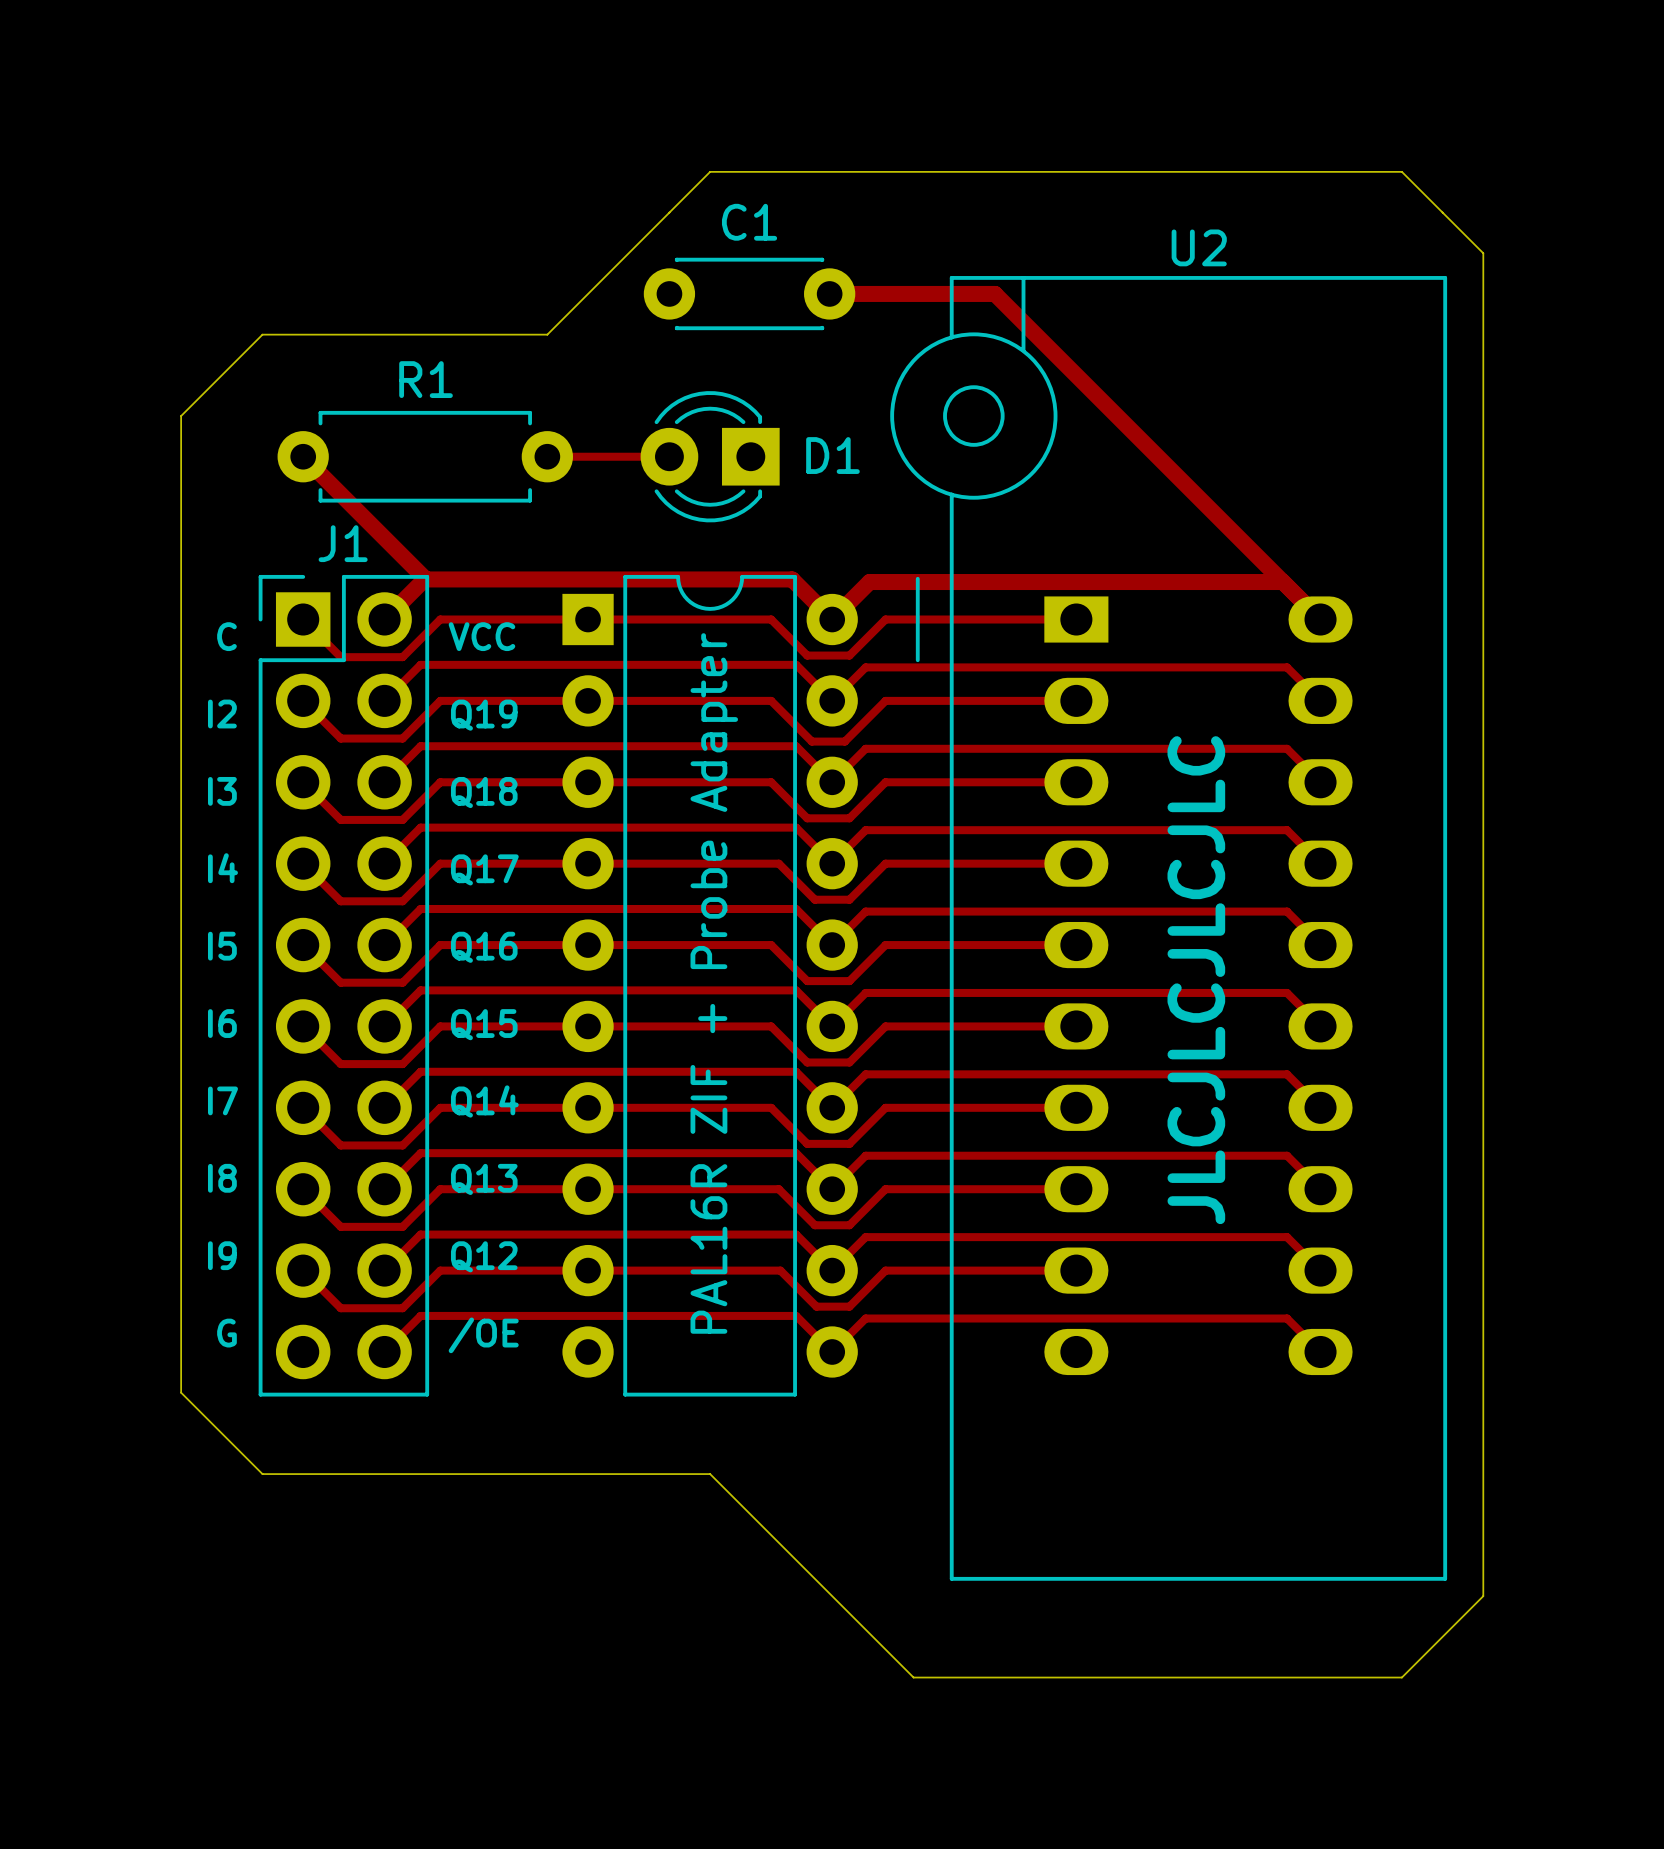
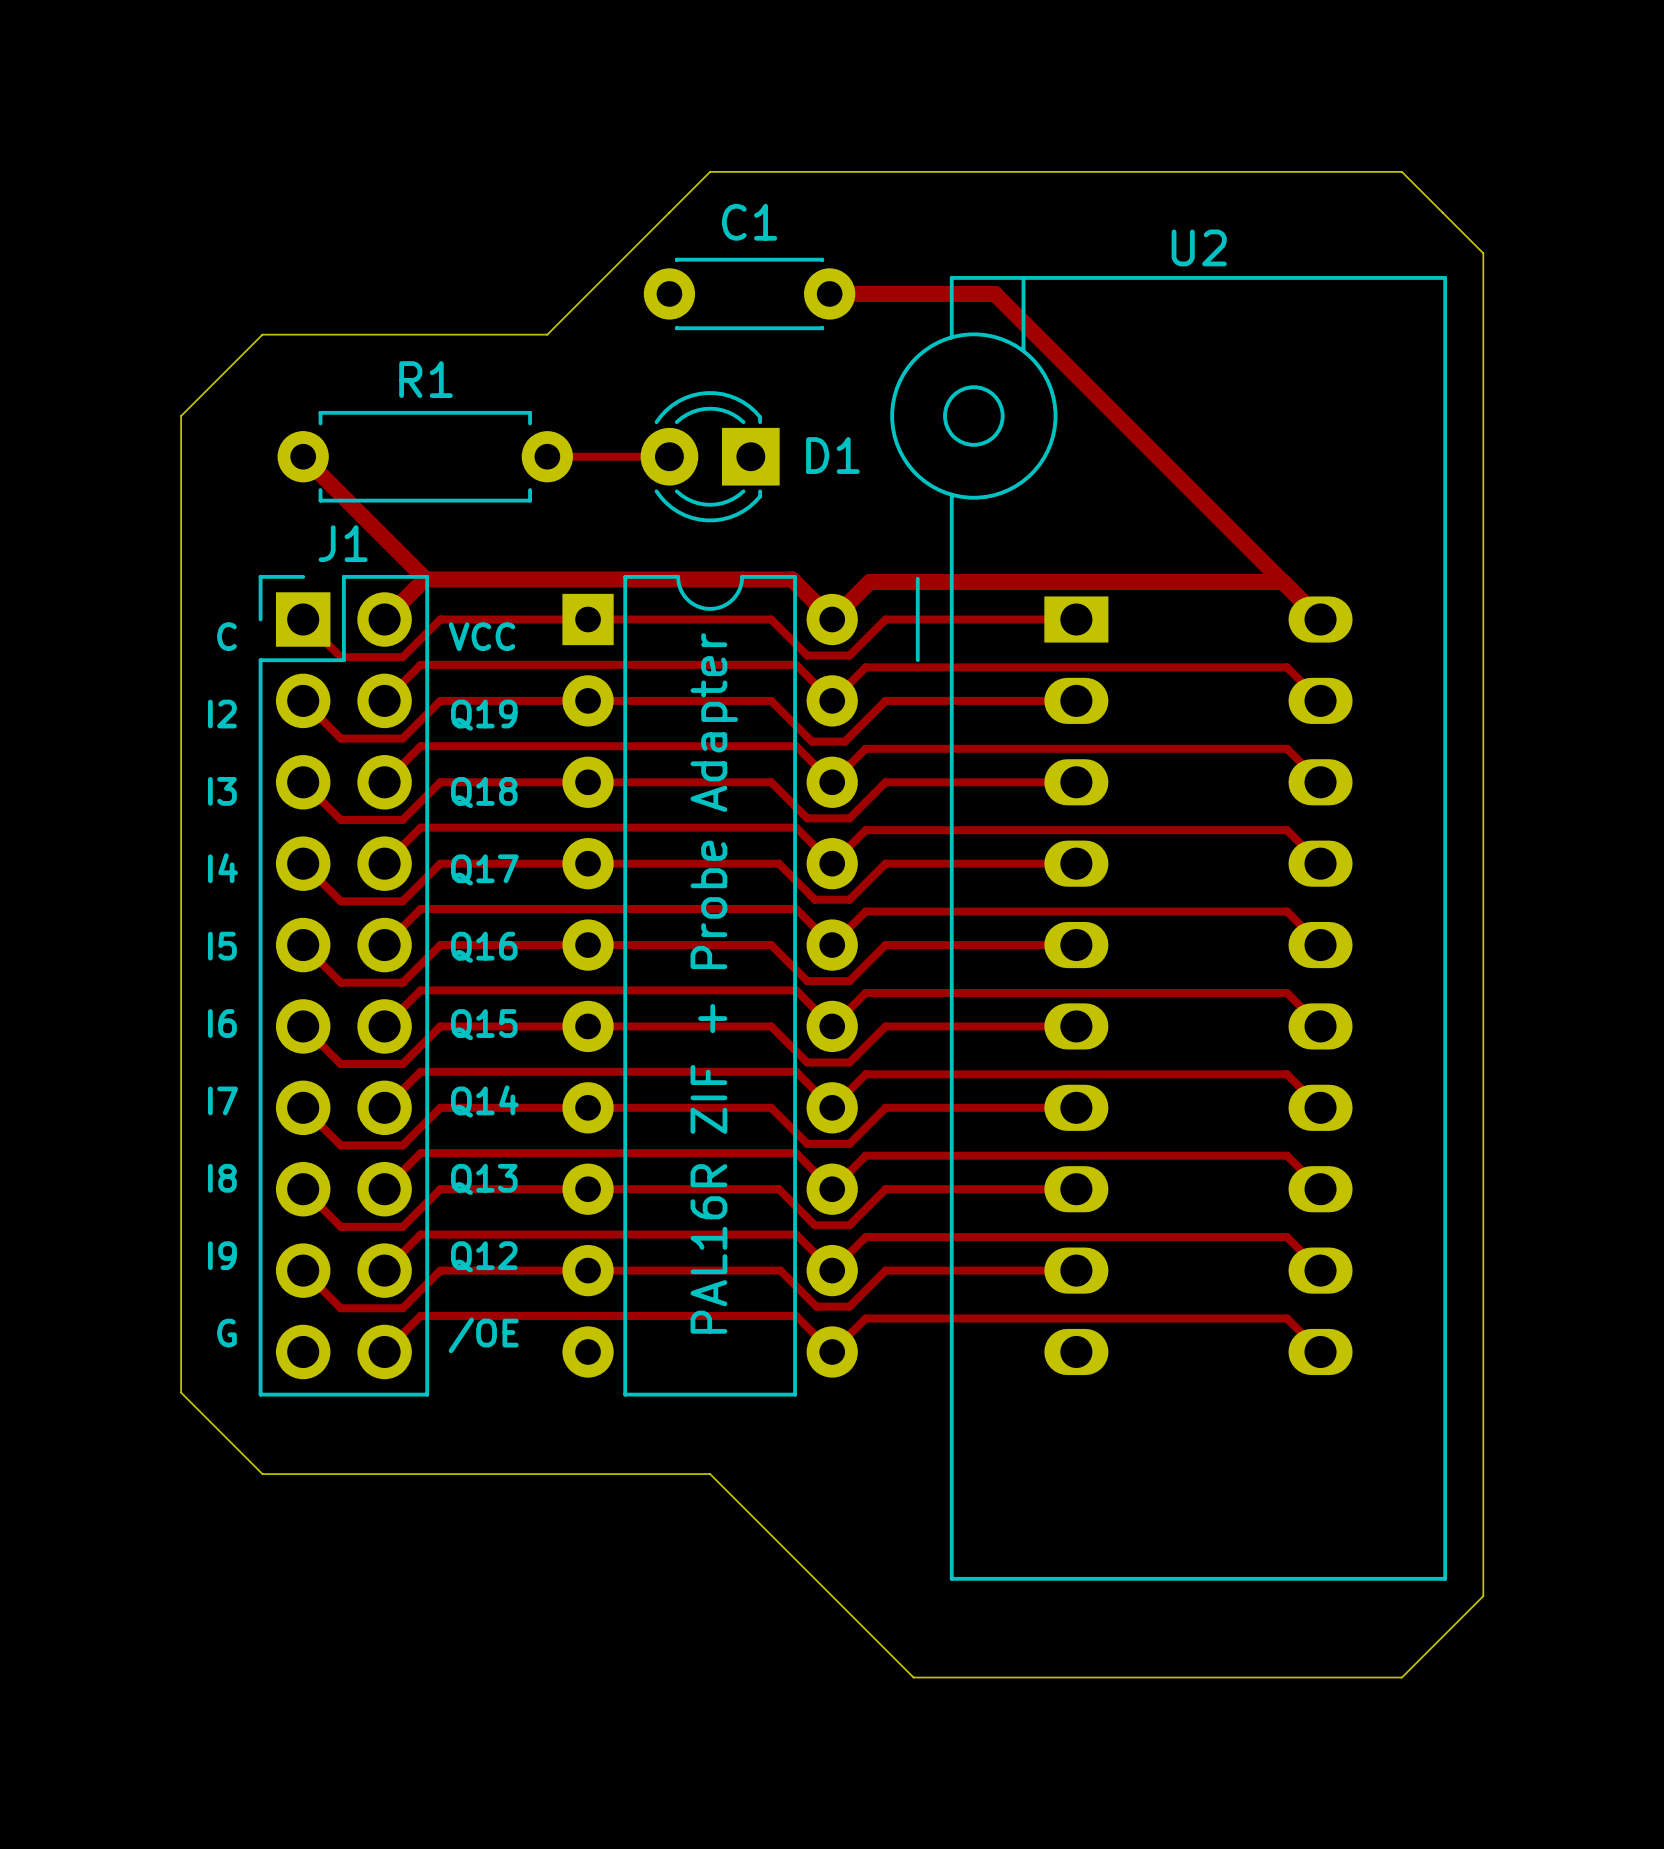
text: JLCJLCJLCJLC (1196, 980) -> none

